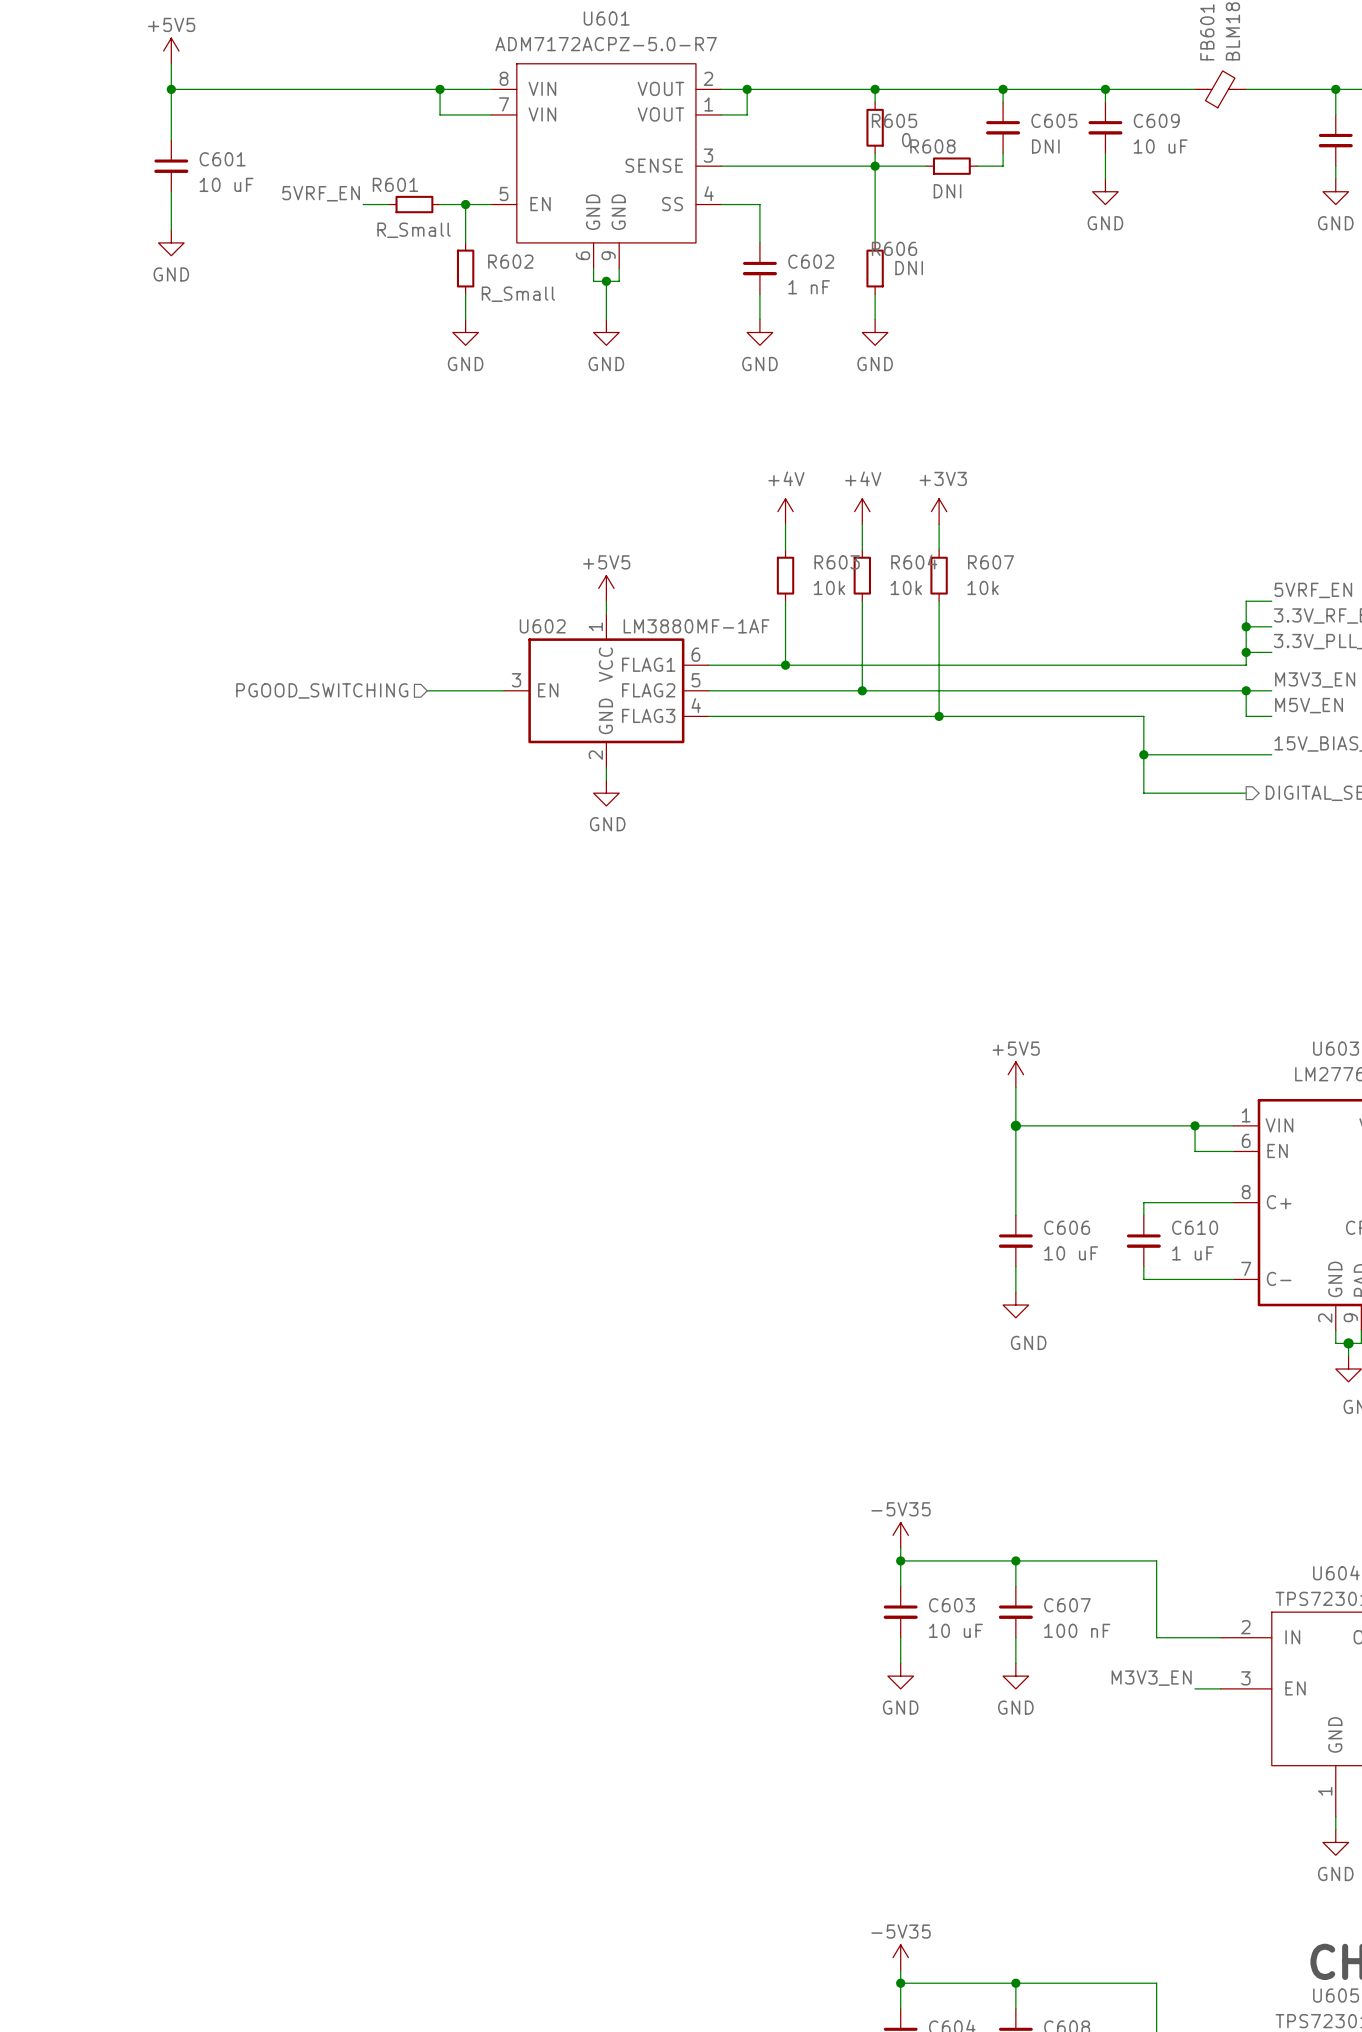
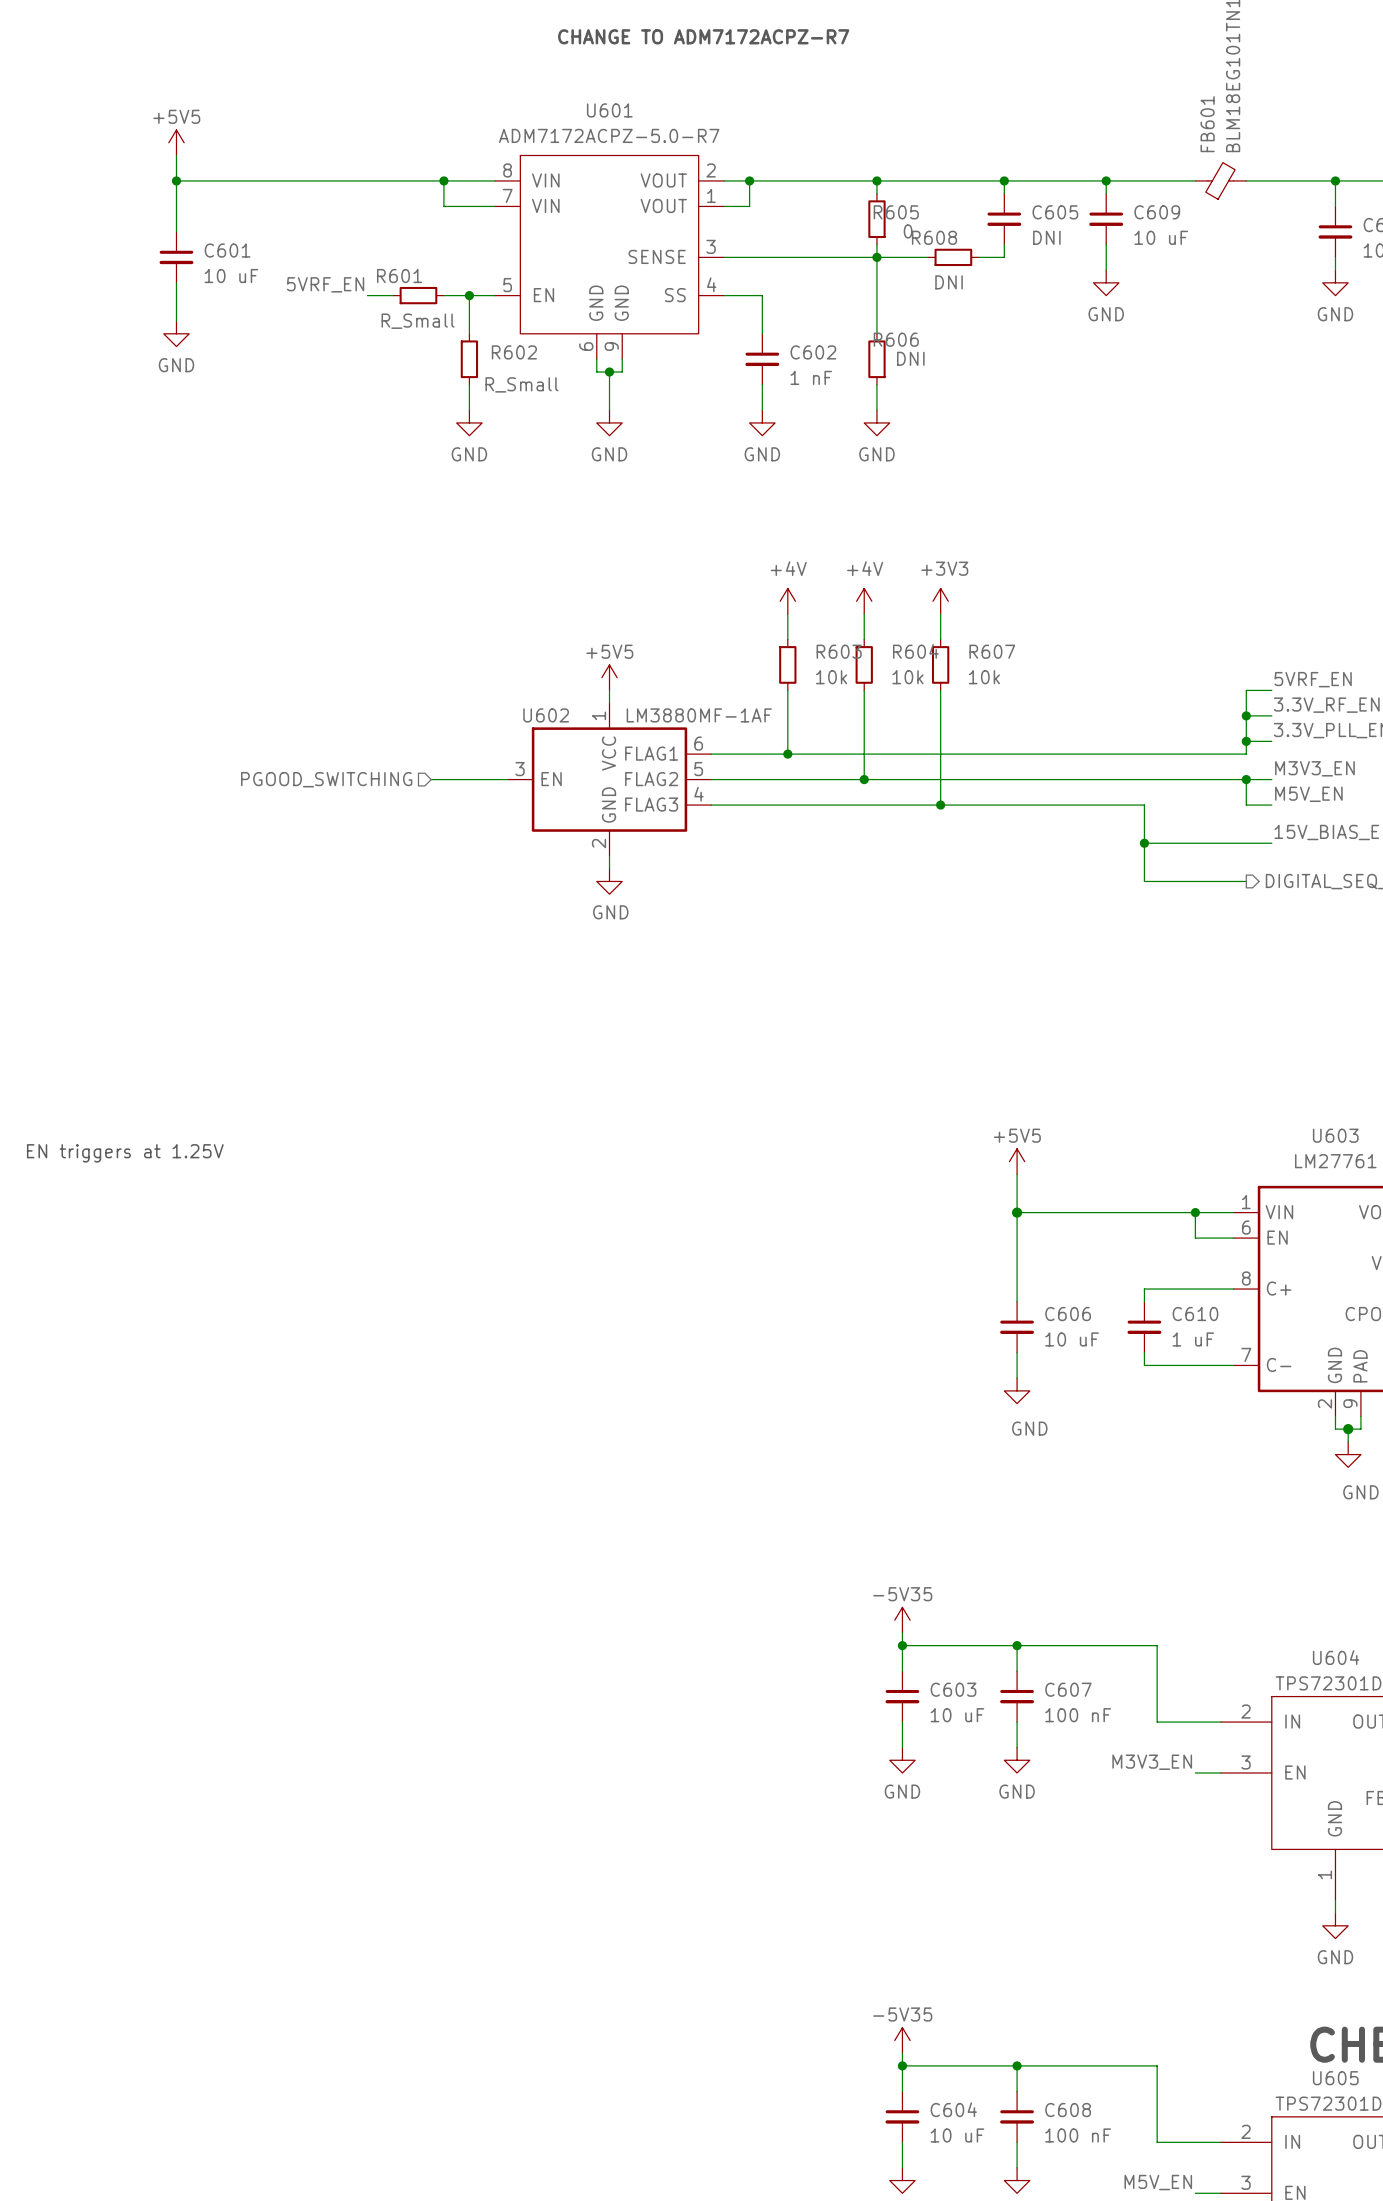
text: none -> EN triggers at 1.25V (125, 1153)

